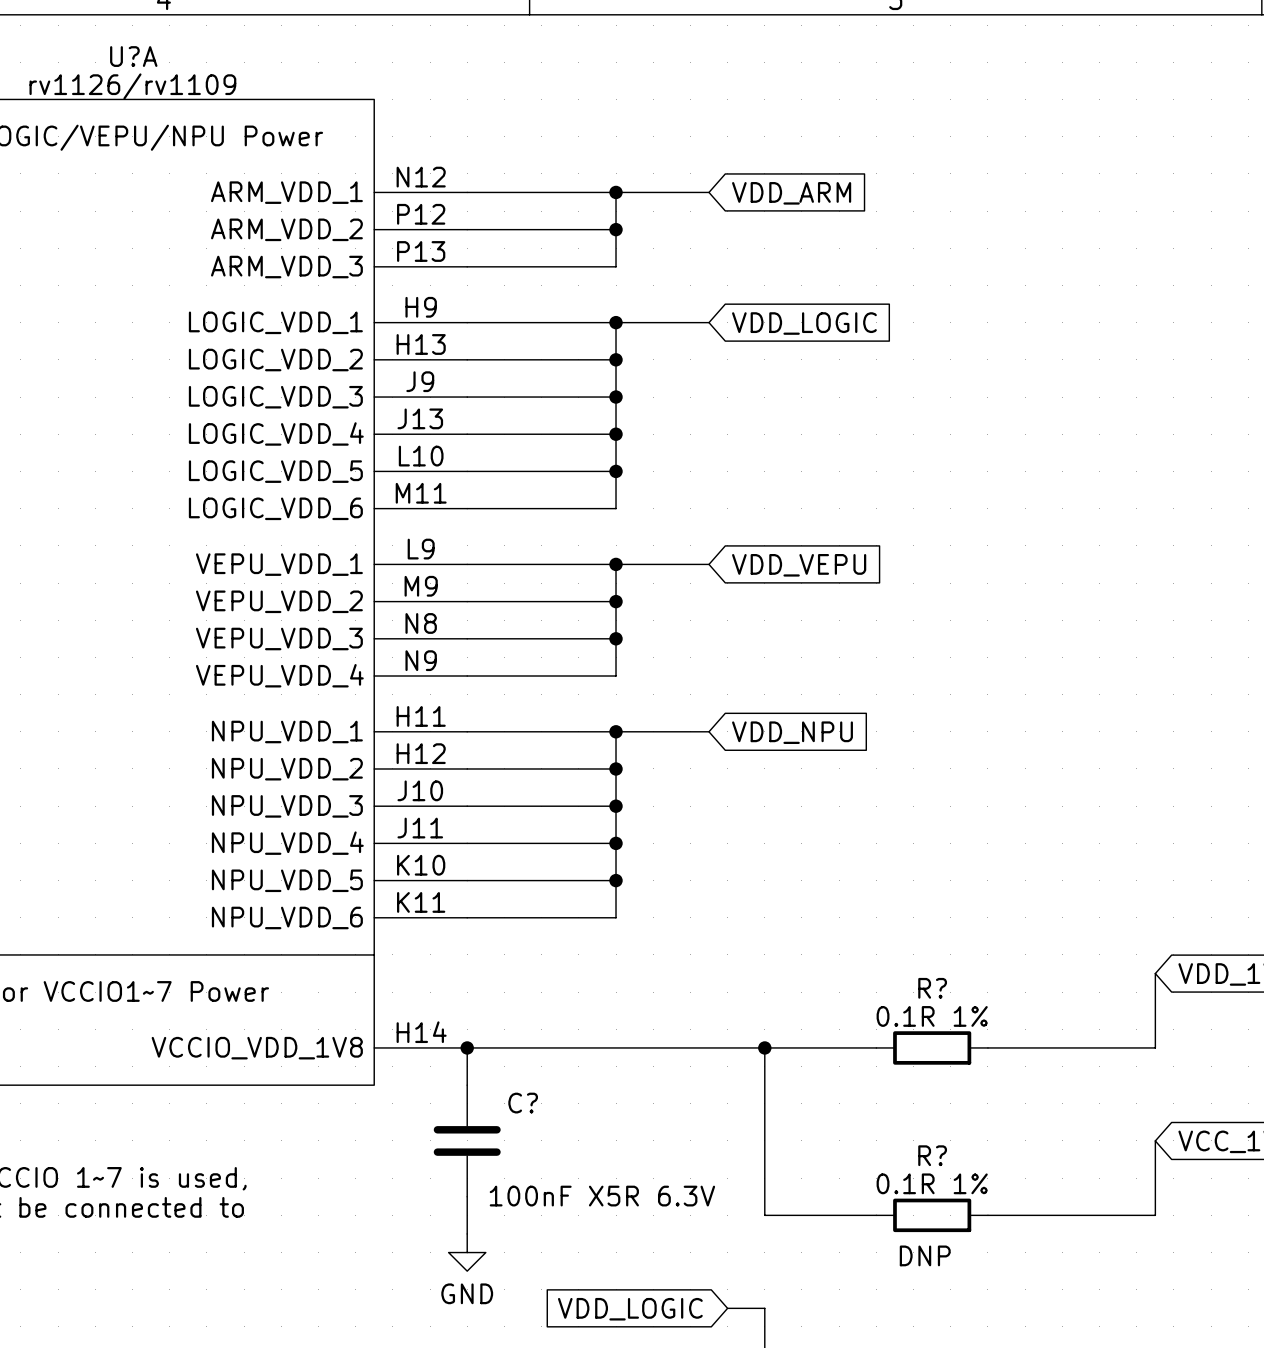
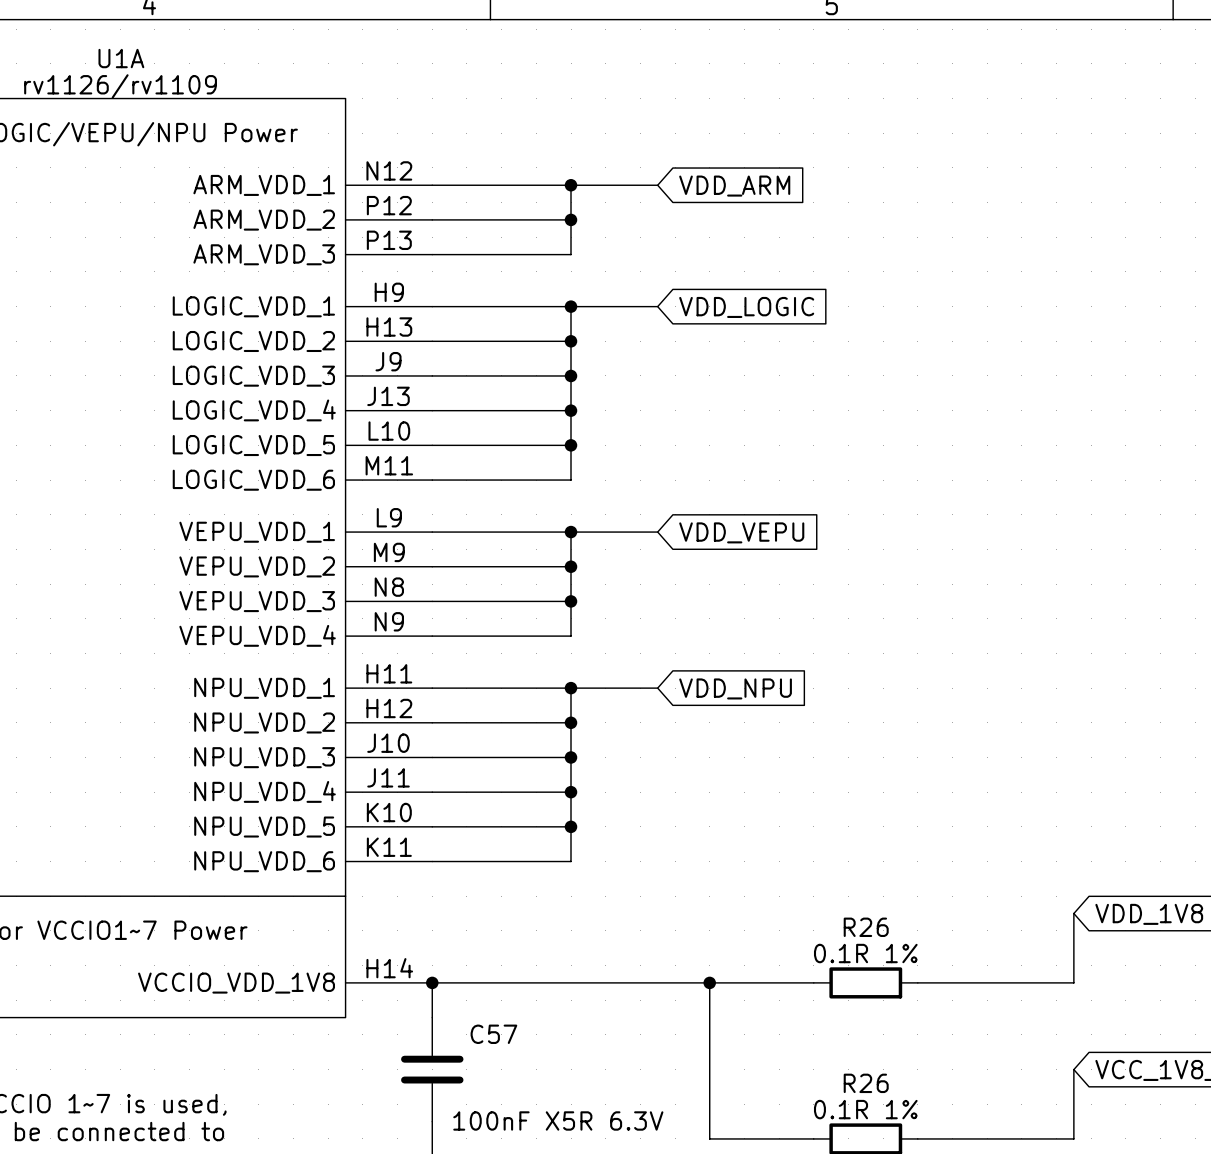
U?A name: U?A (133, 56) -> U1A (121, 58)
R? name: R? (932, 988) -> R26 (866, 927)
C? name: C? (523, 1103) -> C57 (493, 1034)
R? name: R? (932, 1155) -> R26 (866, 1083)

